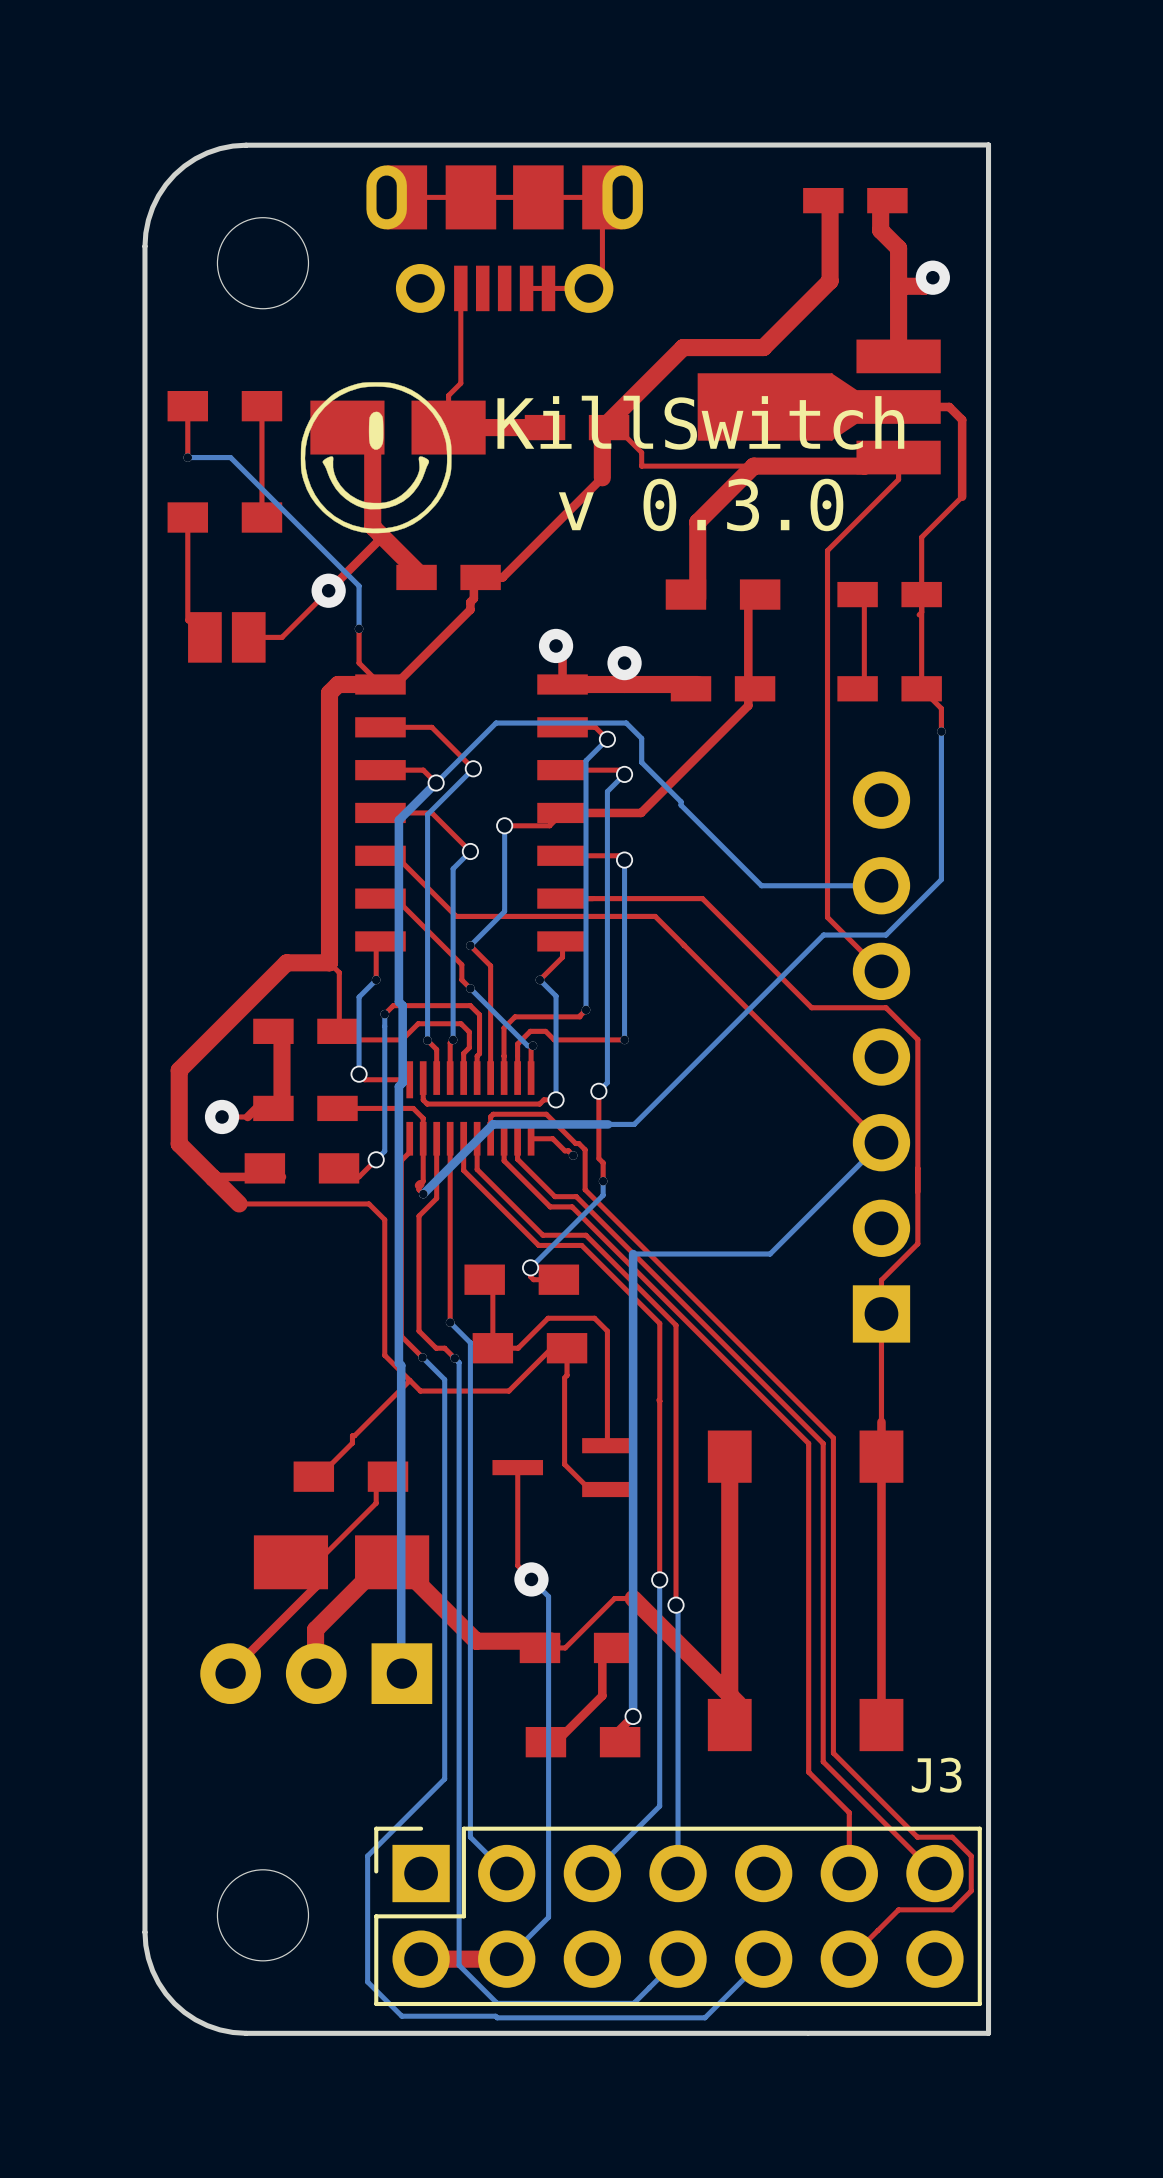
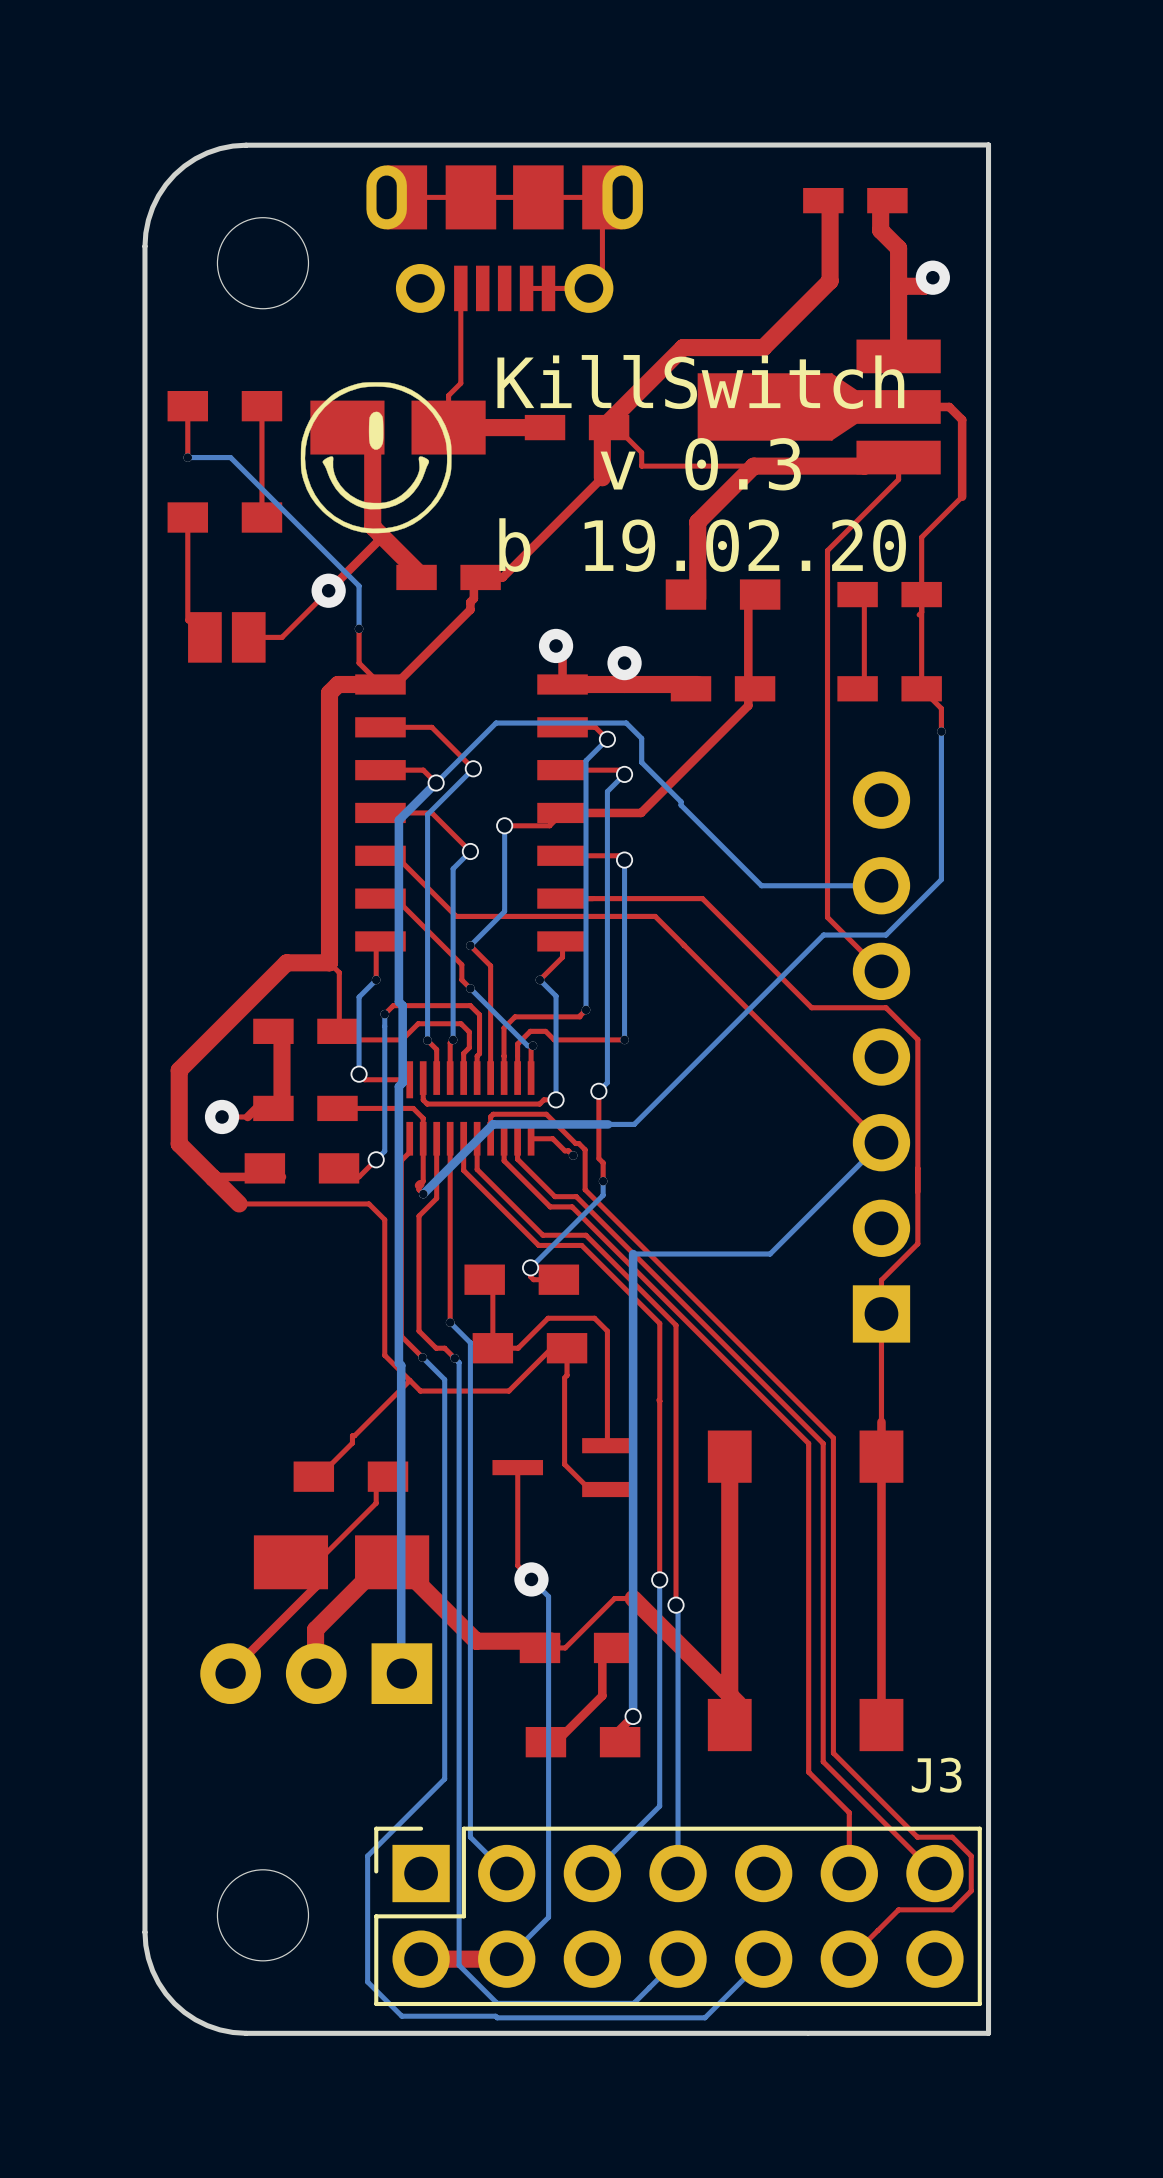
text position: KillSwitch (700, 422) -> KillSwitch (700, 382)
text: v 0.3.0 (701, 504) -> v 0.3 (700, 464)
text: none -> b 19.02.20 (702, 545)

